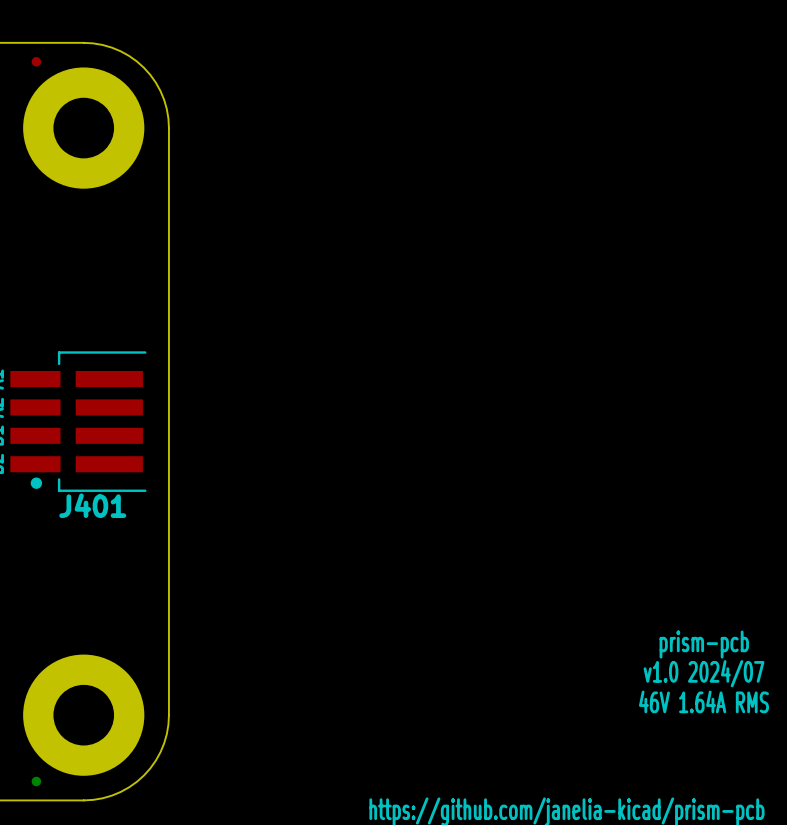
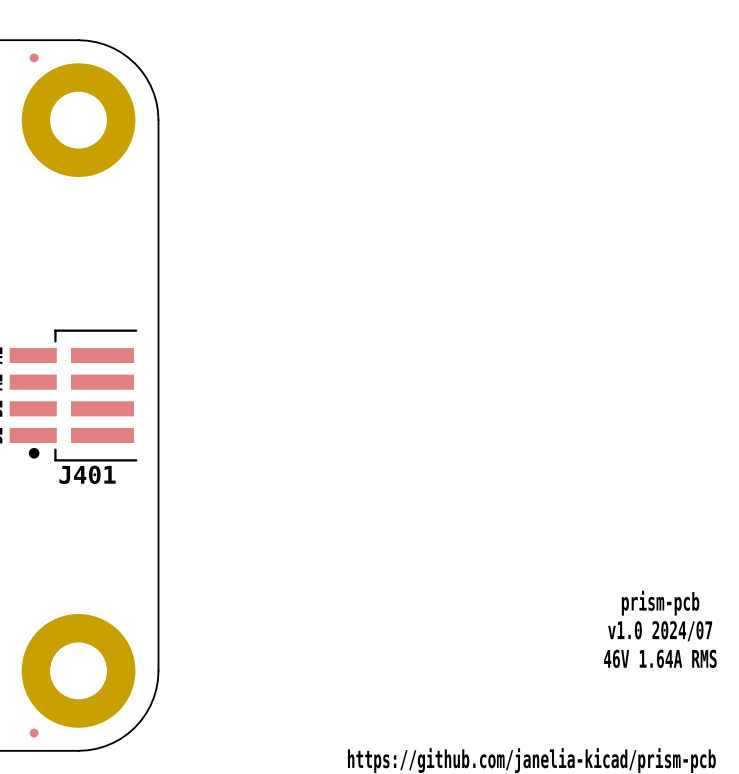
part side: bottom (36, 781) -> top (34, 733)

